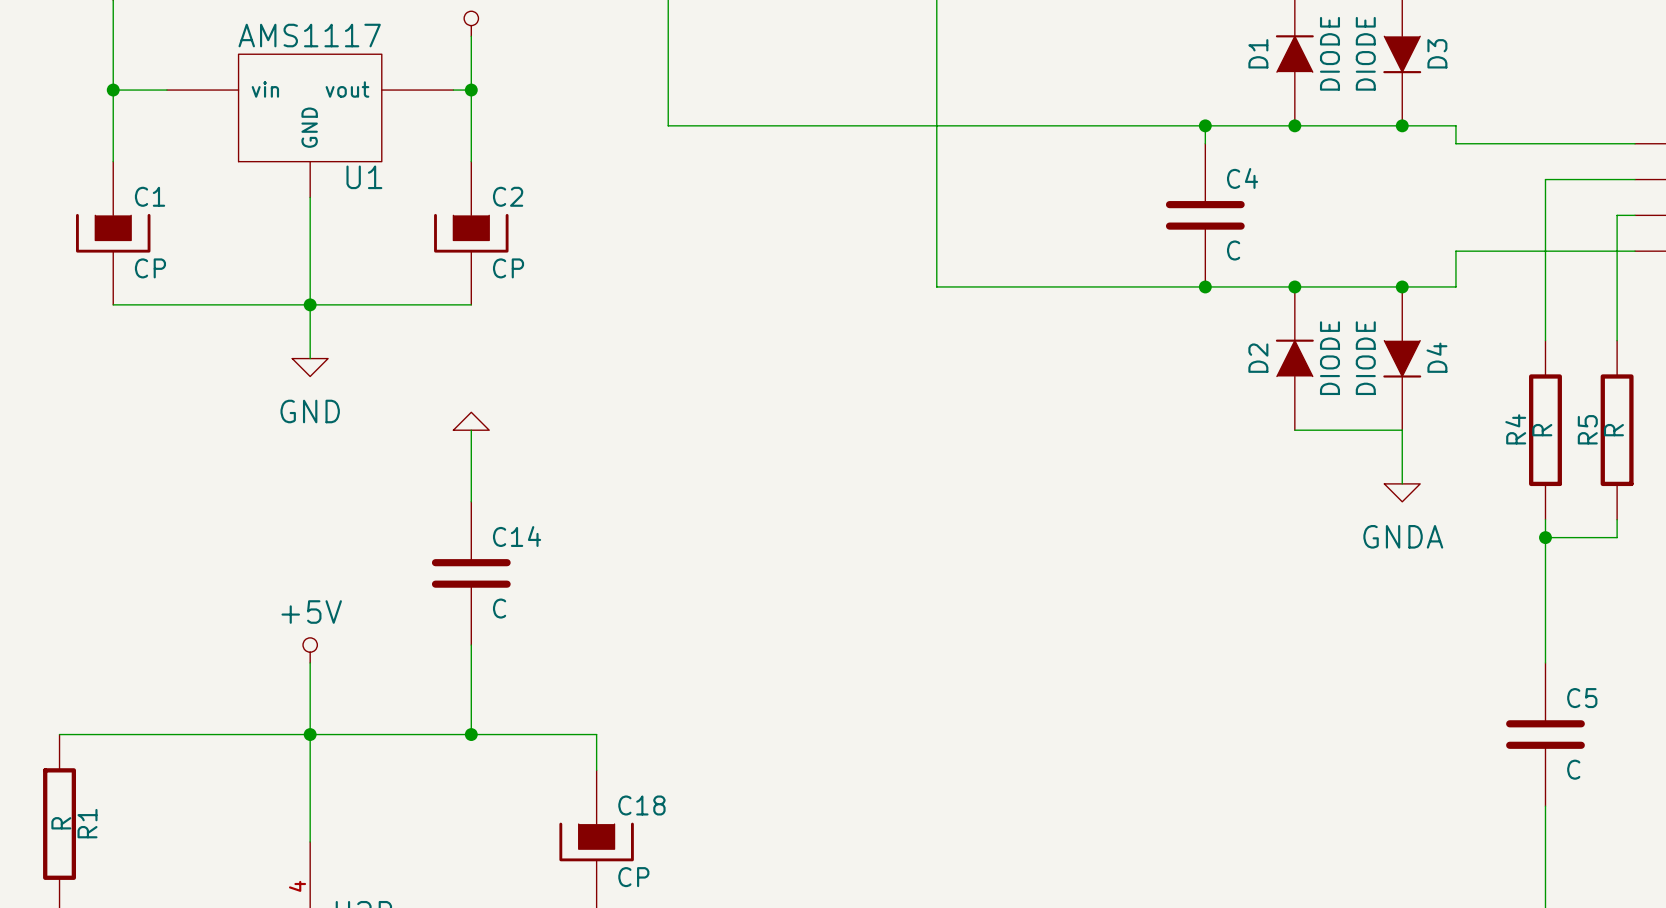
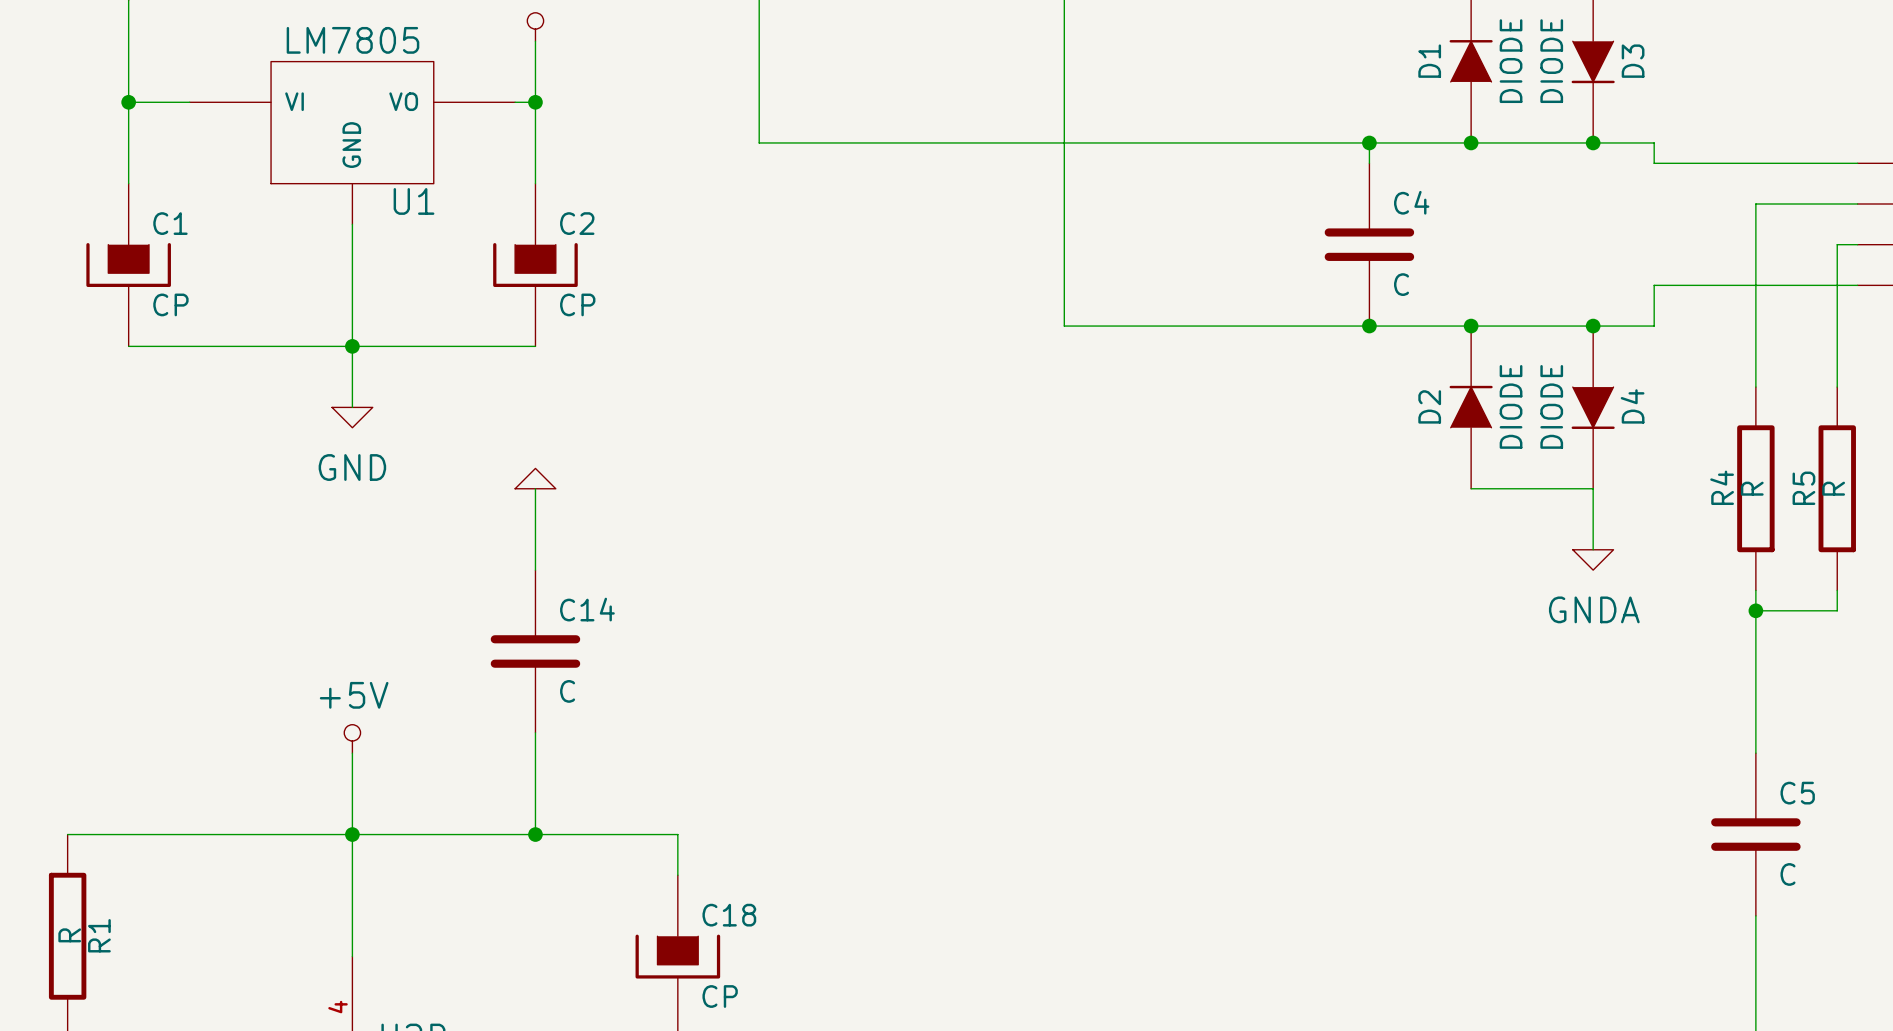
U1 value: AMS1117 (309, 35) -> LM7805 (352, 40)
U1 pin name: vin (265, 89) -> VI (294, 101)
U1 pin name: vout (347, 89) -> VO (403, 101)

